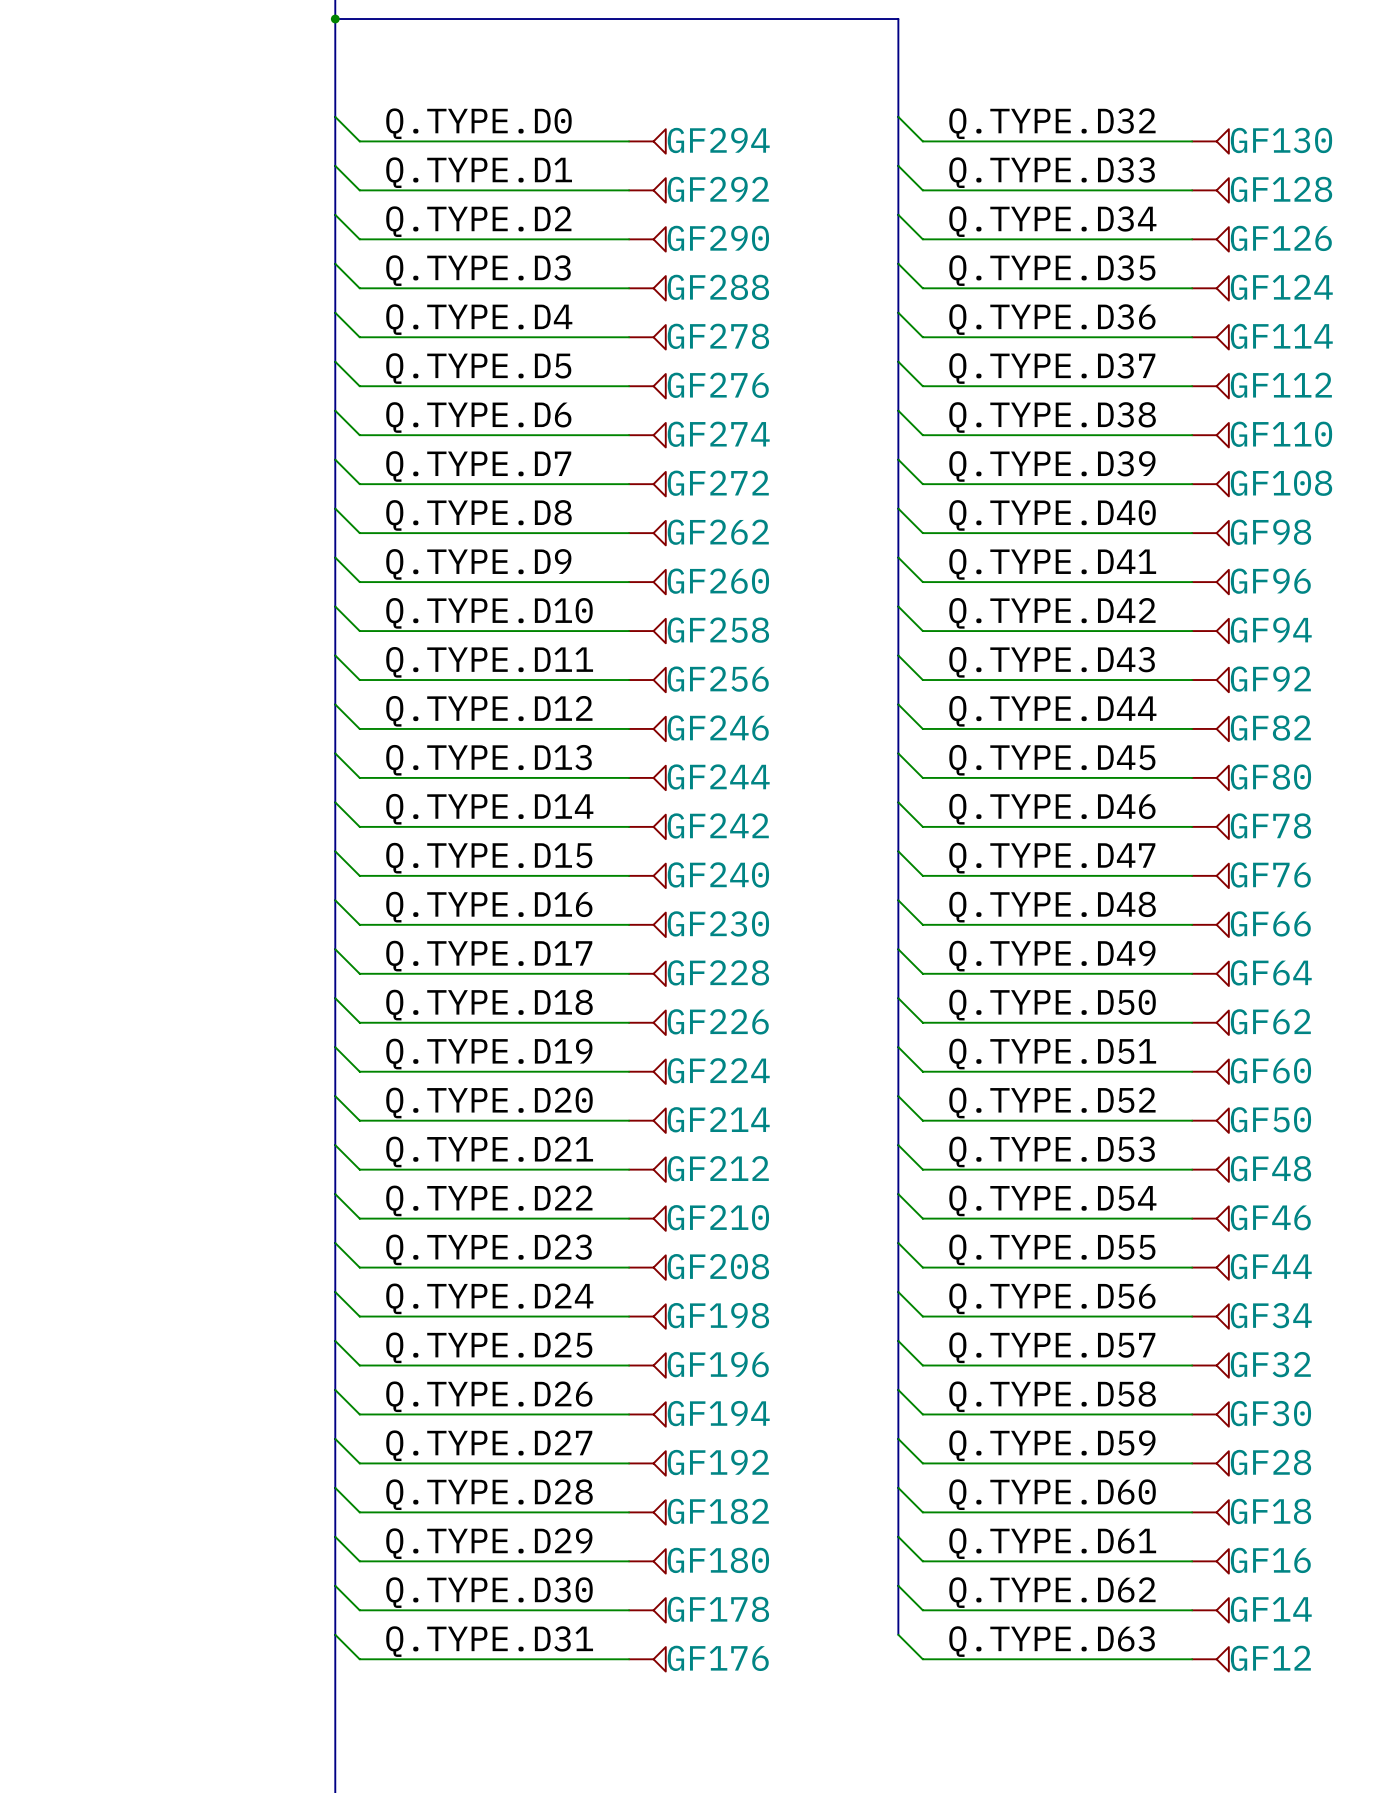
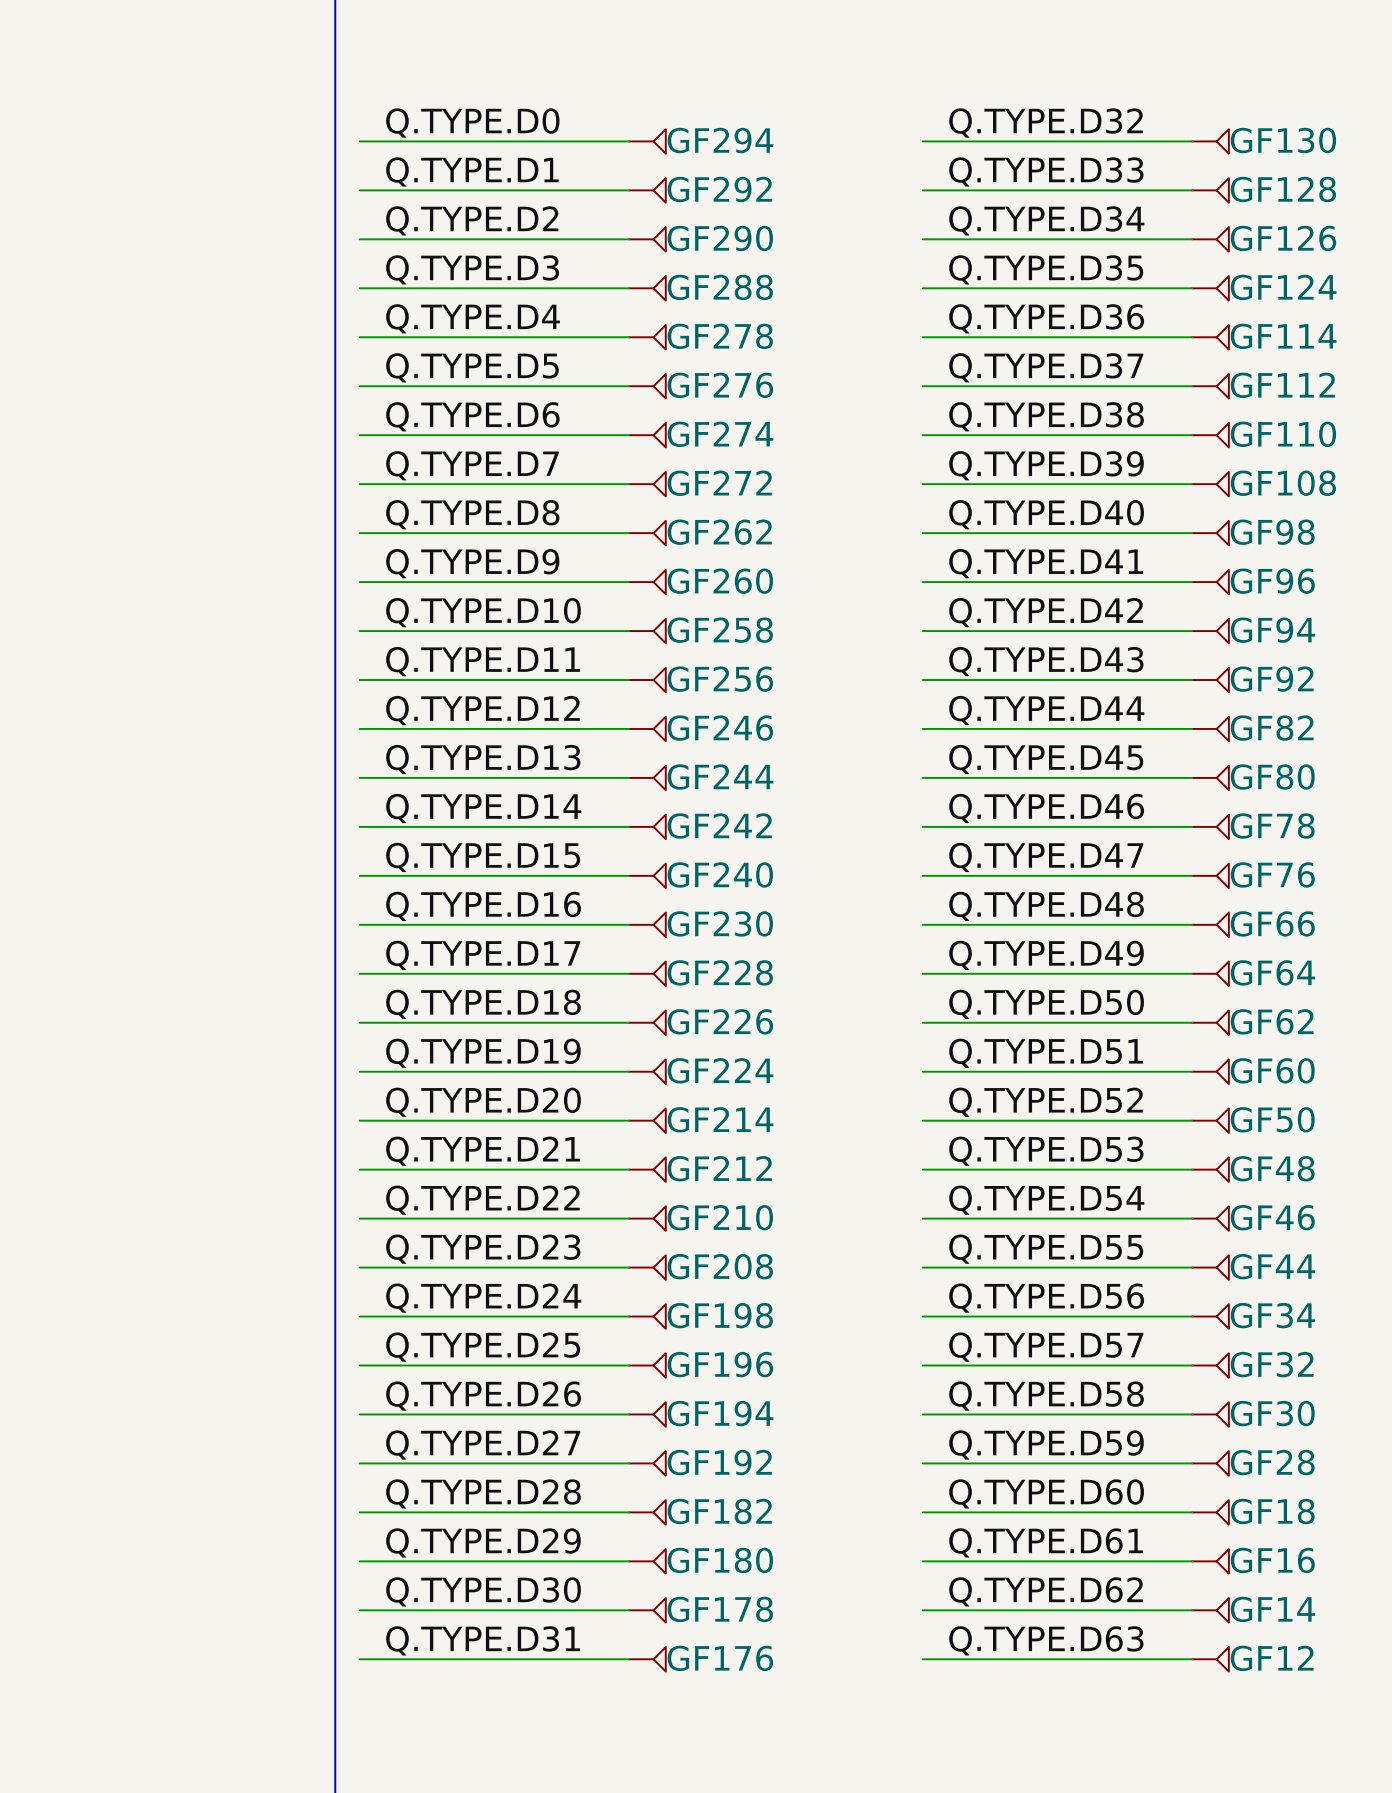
bus: (335, 19) (898, 19) (898, 1634) -> none
junction: (335, 19) -> none
wire: (335, 116) (359, 141) -> none
wire: (898, 116) (922, 141) -> none
wire: (335, 165) (359, 190) -> none
wire: (898, 165) (922, 190) -> none
wire: (335, 214) (359, 239) -> none
wire: (898, 214) (922, 239) -> none
wire: (335, 263) (359, 288) -> none
wire: (898, 263) (922, 288) -> none
wire: (335, 312) (359, 337) -> none
wire: (898, 312) (922, 337) -> none
wire: (335, 361) (359, 386) -> none
wire: (898, 361) (922, 386) -> none
wire: (335, 410) (359, 435) -> none
wire: (898, 410) (922, 435) -> none
wire: (335, 459) (359, 484) -> none
wire: (898, 459) (922, 484) -> none
wire: (335, 508) (359, 533) -> none
wire: (898, 508) (922, 533) -> none
wire: (335, 557) (359, 582) -> none
wire: (898, 557) (922, 582) -> none
wire: (335, 606) (359, 631) -> none
wire: (898, 606) (922, 631) -> none
wire: (335, 655) (359, 680) -> none
wire: (898, 655) (922, 680) -> none
wire: (335, 704) (359, 728) -> none
wire: (898, 704) (922, 728) -> none
wire: (335, 753) (359, 777) -> none
wire: (898, 753) (922, 777) -> none
wire: (335, 802) (359, 826) -> none
wire: (898, 802) (922, 826) -> none
wire: (335, 851) (359, 875) -> none
wire: (898, 851) (922, 875) -> none
wire: (335, 900) (359, 924) -> none
wire: (898, 900) (922, 924) -> none
wire: (335, 949) (359, 973) -> none
wire: (898, 949) (922, 973) -> none
wire: (335, 998) (359, 1022) -> none
wire: (898, 998) (922, 1022) -> none
wire: (335, 1047) (359, 1071) -> none
wire: (898, 1047) (922, 1071) -> none
wire: (335, 1096) (359, 1120) -> none
wire: (898, 1096) (922, 1120) -> none
wire: (335, 1145) (359, 1169) -> none
wire: (898, 1145) (922, 1169) -> none
wire: (335, 1194) (359, 1218) -> none
wire: (898, 1194) (922, 1218) -> none
wire: (335, 1243) (359, 1267) -> none
wire: (898, 1243) (922, 1267) -> none
wire: (335, 1292) (359, 1316) -> none
wire: (898, 1292) (922, 1316) -> none
wire: (335, 1341) (359, 1365) -> none
wire: (898, 1341) (922, 1365) -> none
wire: (335, 1389) (359, 1414) -> none
wire: (898, 1389) (922, 1414) -> none
wire: (335, 1438) (359, 1463) -> none
wire: (898, 1438) (922, 1463) -> none
wire: (335, 1487) (359, 1512) -> none
wire: (898, 1487) (922, 1512) -> none
wire: (335, 1536) (359, 1561) -> none
wire: (898, 1536) (922, 1561) -> none
wire: (335, 1585) (359, 1610) -> none
wire: (898, 1585) (922, 1610) -> none
wire: (335, 1634) (359, 1659) -> none
wire: (898, 1634) (922, 1659) -> none

